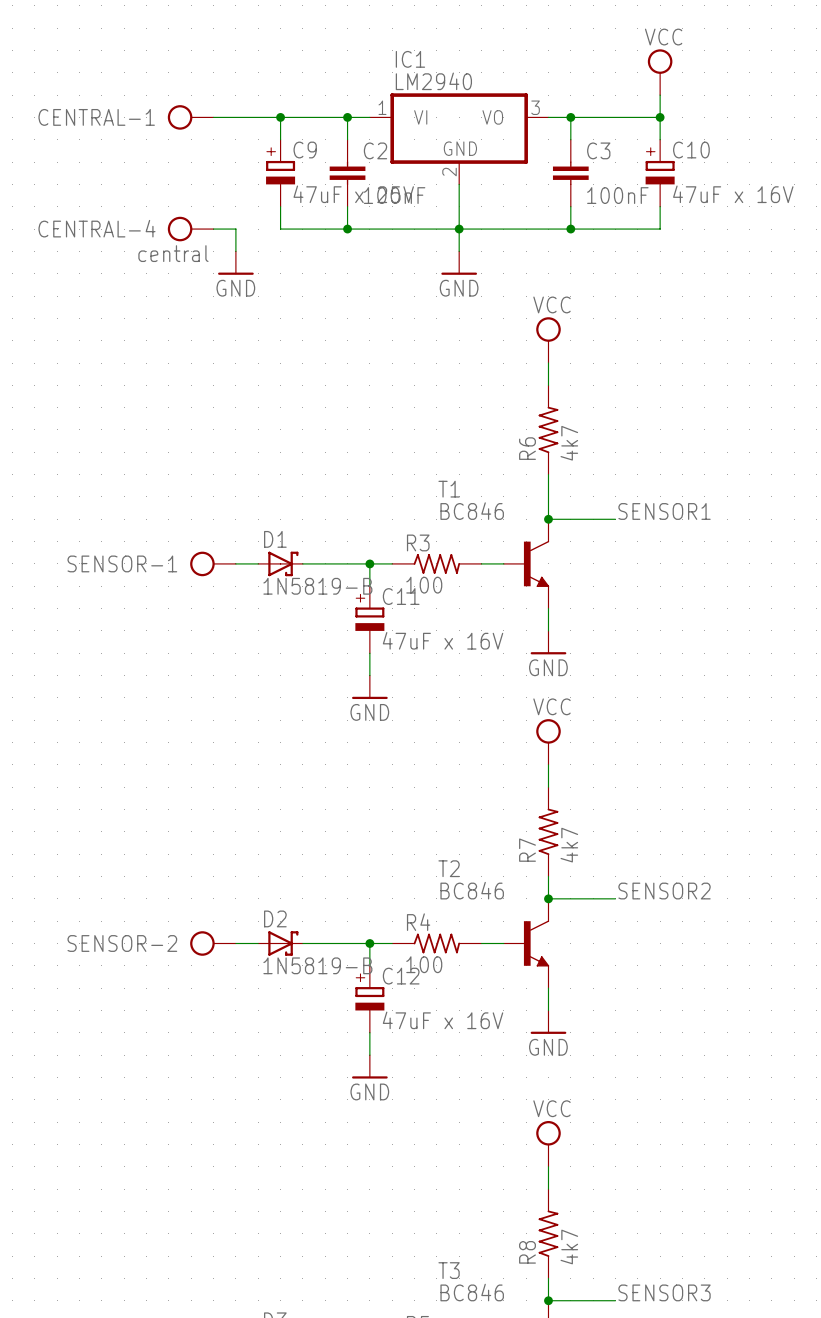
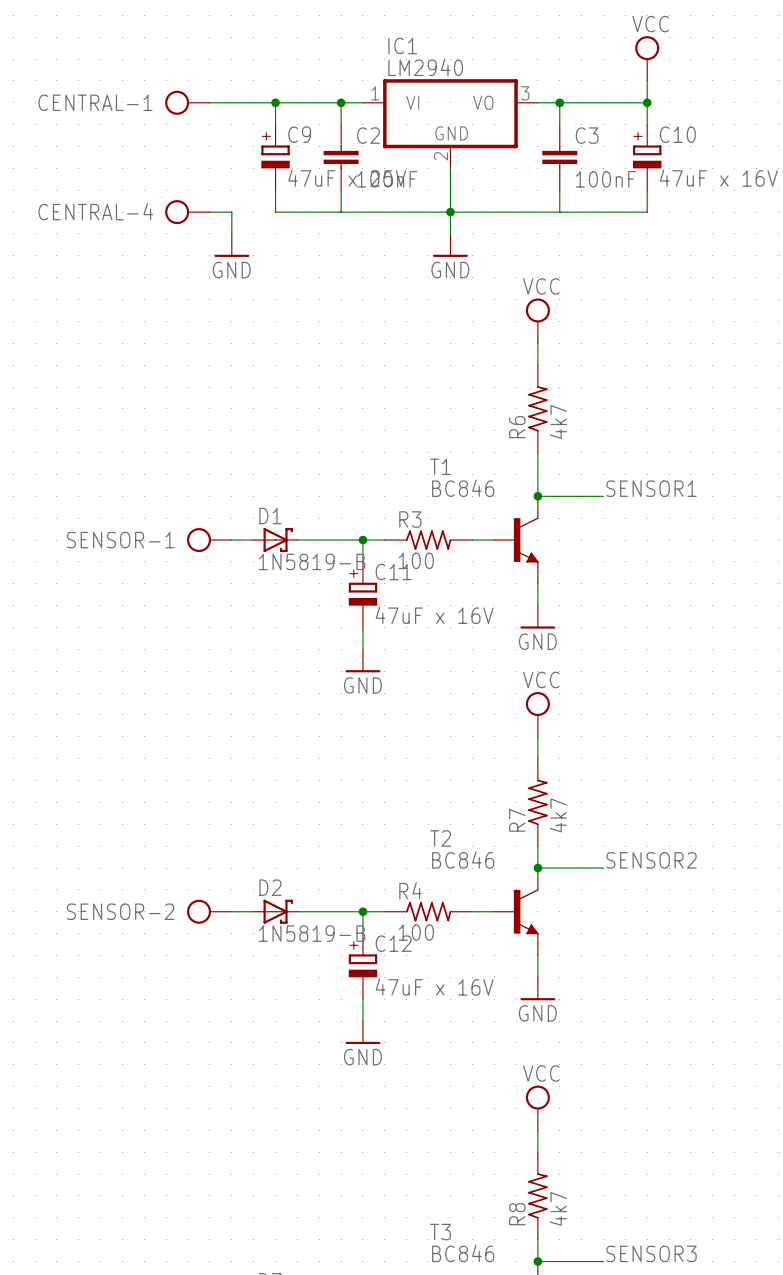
junction: (347, 229) -> none
junction: (570, 229) -> none
CENTRAL-4 value: central (173, 253) -> none

